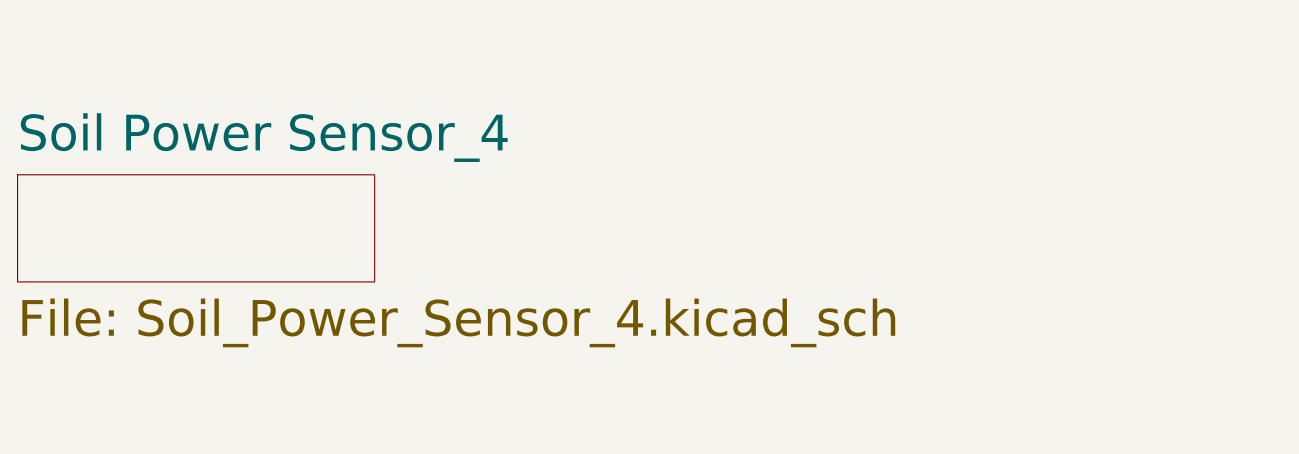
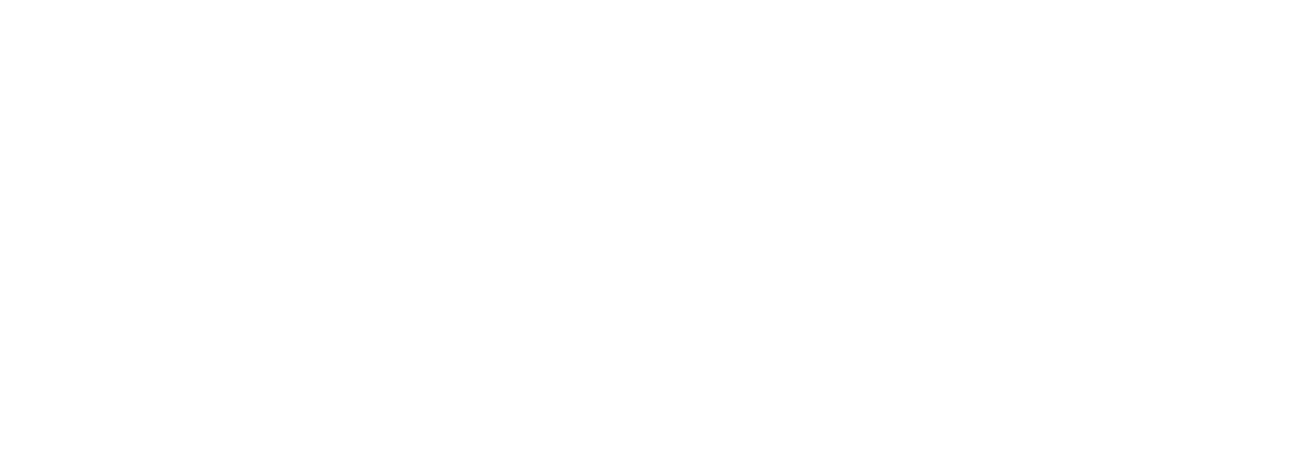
sheet Soil Power Sensor_4: File: Soil_Power_Sensor_4.kicad_sch (196, 228) -> none

